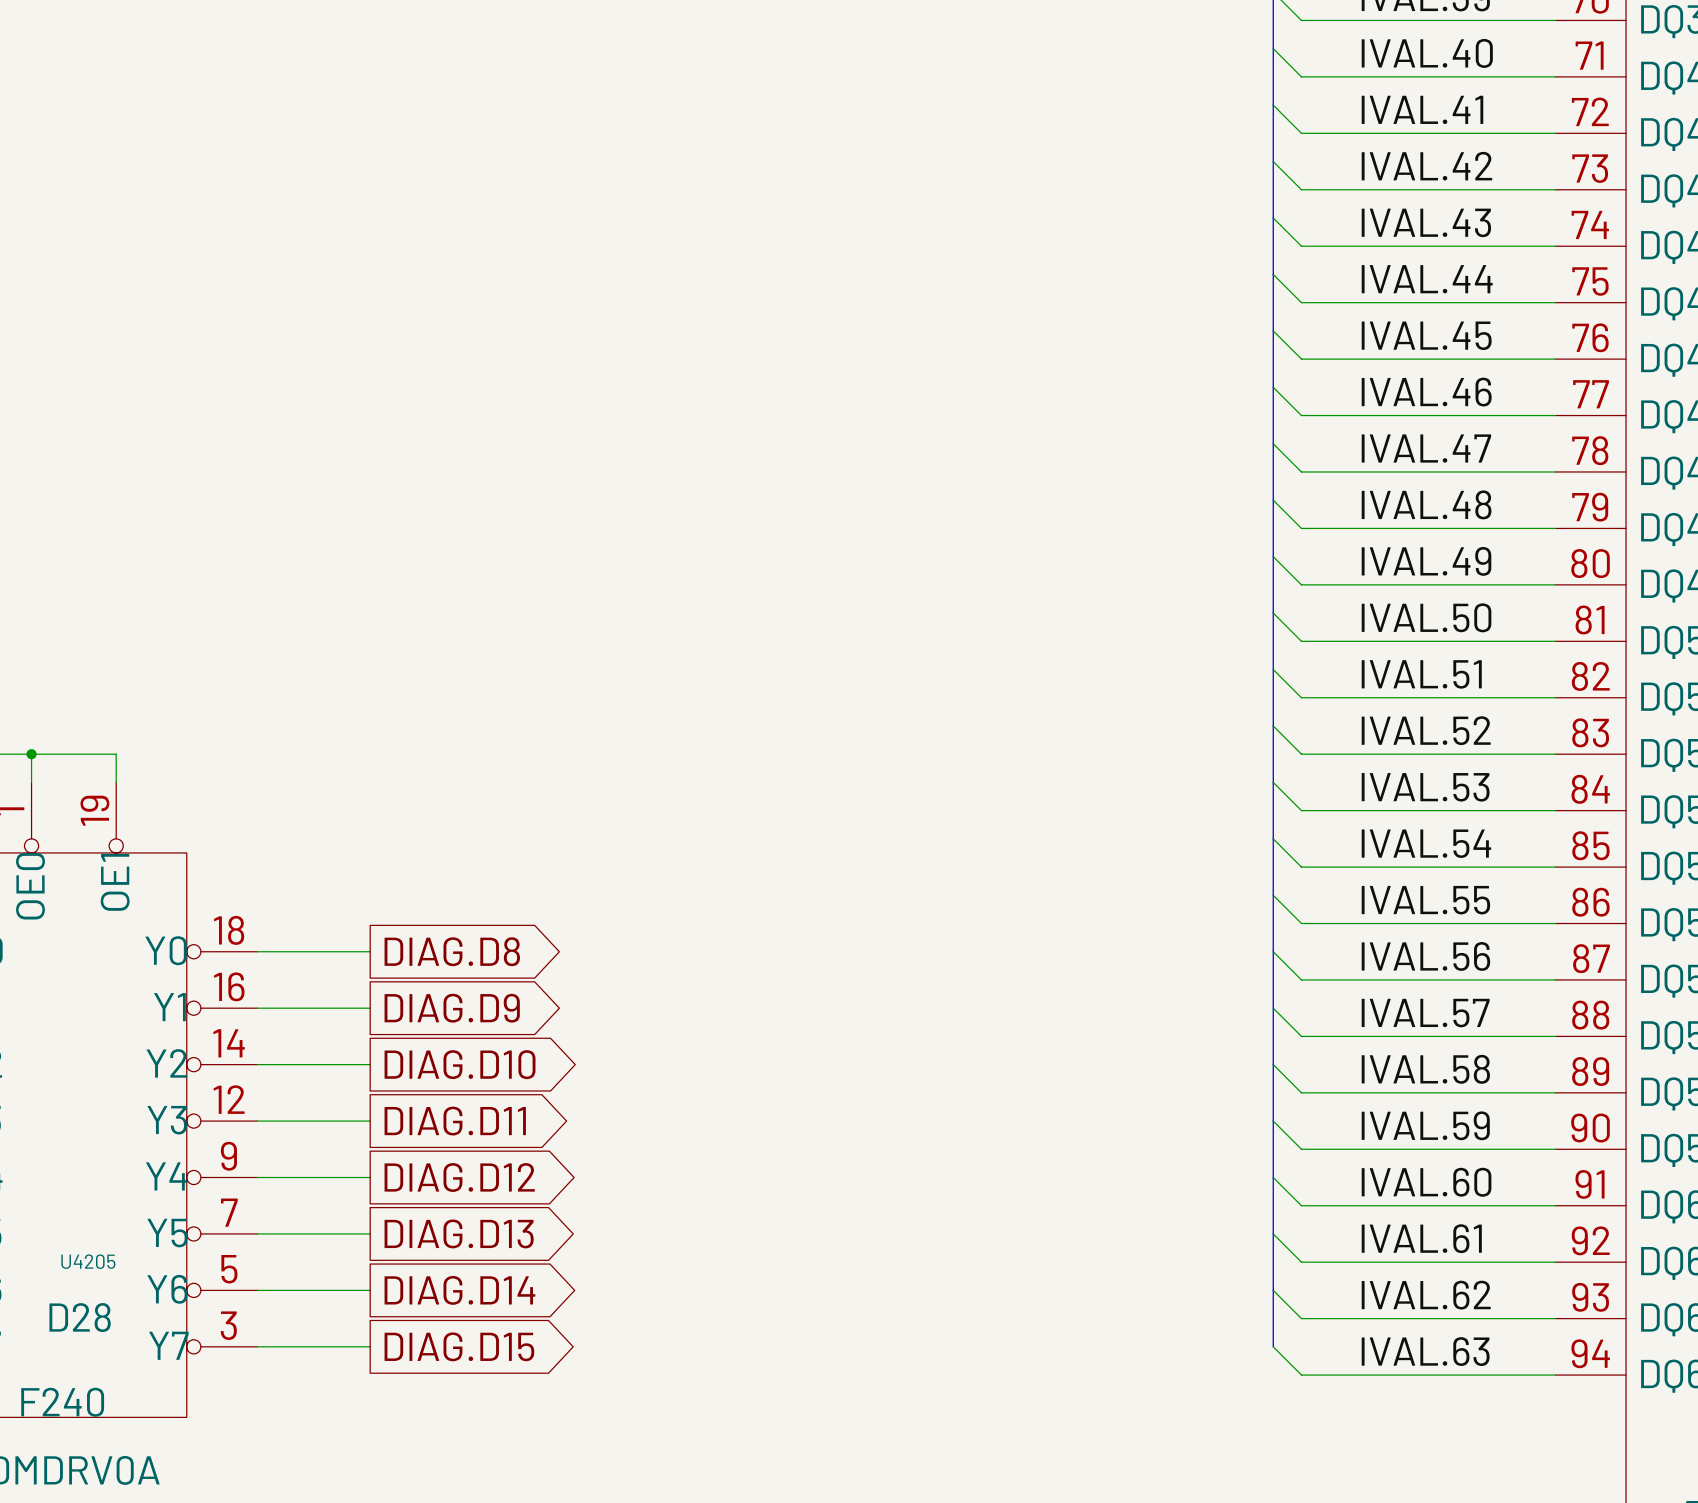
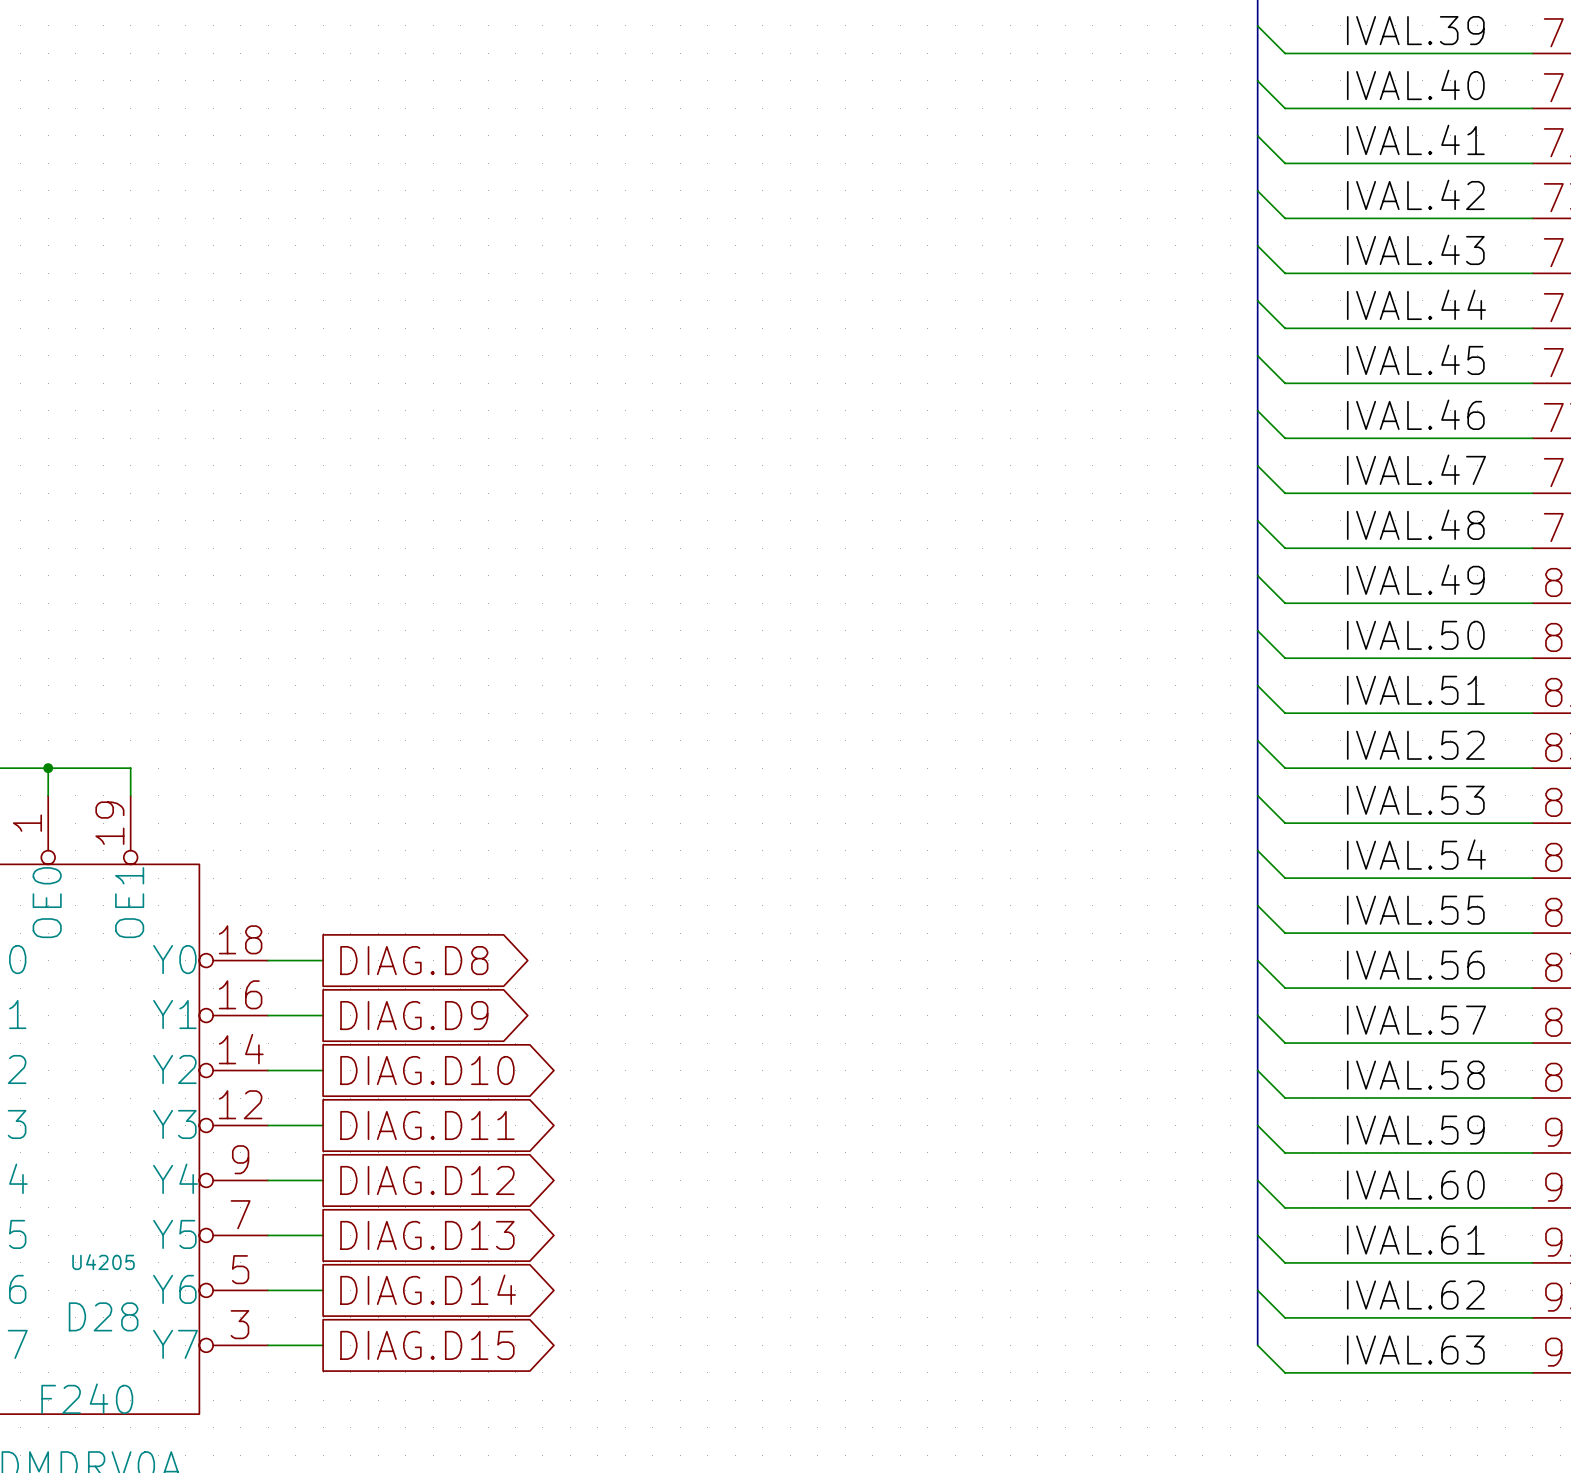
wire: (313, 951) (370, 951) -> none
global label position: DIAG.D8 (452, 951) -> DIAG.D8 (414, 960)
wire: (313, 1008) (370, 1008) -> none
global label position: DIAG.D9 (452, 1008) -> DIAG.D9 (414, 1015)
wire: (313, 1064) (370, 1064) -> none
global label position: DIAG.D10 (460, 1064) -> DIAG.D10 (427, 1070)
wire: (313, 1121) (370, 1121) -> none
global label position: DIAG.D11 (455, 1121) -> DIAG.D11 (427, 1125)
wire: (313, 1177) (370, 1177) -> none
global label position: DIAG.D12 (459, 1177) -> DIAG.D12 (427, 1180)
wire: (313, 1233) (370, 1233) -> none
global label position: DIAG.D13 (459, 1233) -> DIAG.D13 (427, 1235)
wire: (313, 1290) (370, 1290) -> none
global label position: DIAG.D14 (459, 1290) -> DIAG.D14 (428, 1289)
wire: (313, 1346) (370, 1346) -> none
global label position: DIAG.D15 (459, 1346) -> DIAG.D15 (427, 1345)

